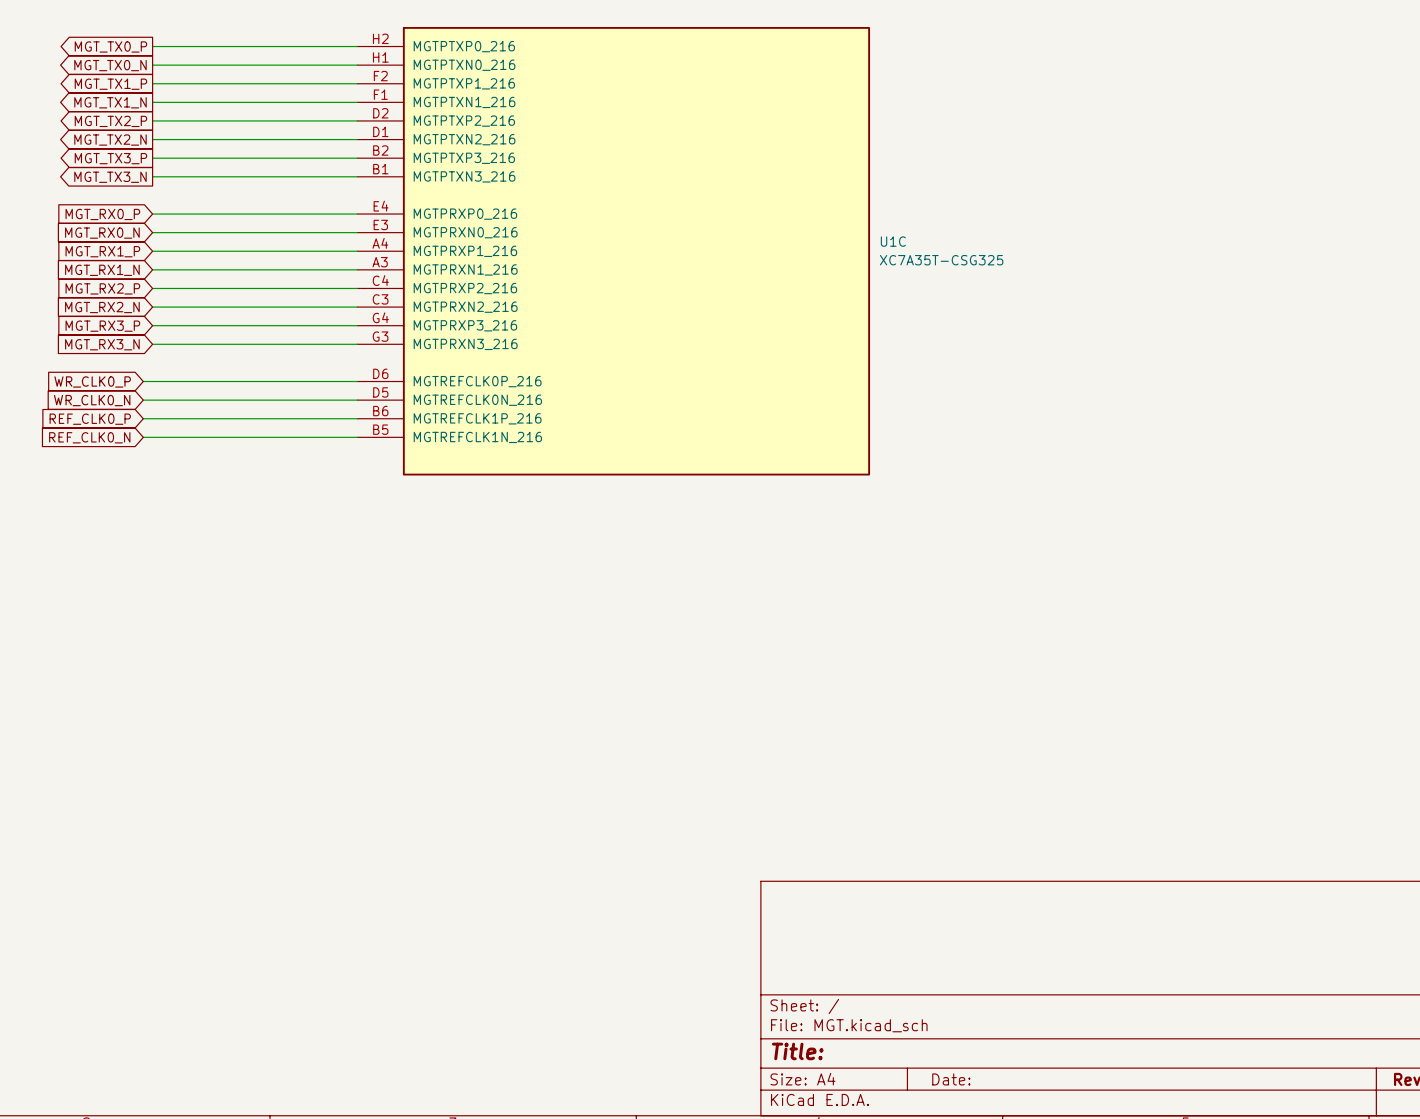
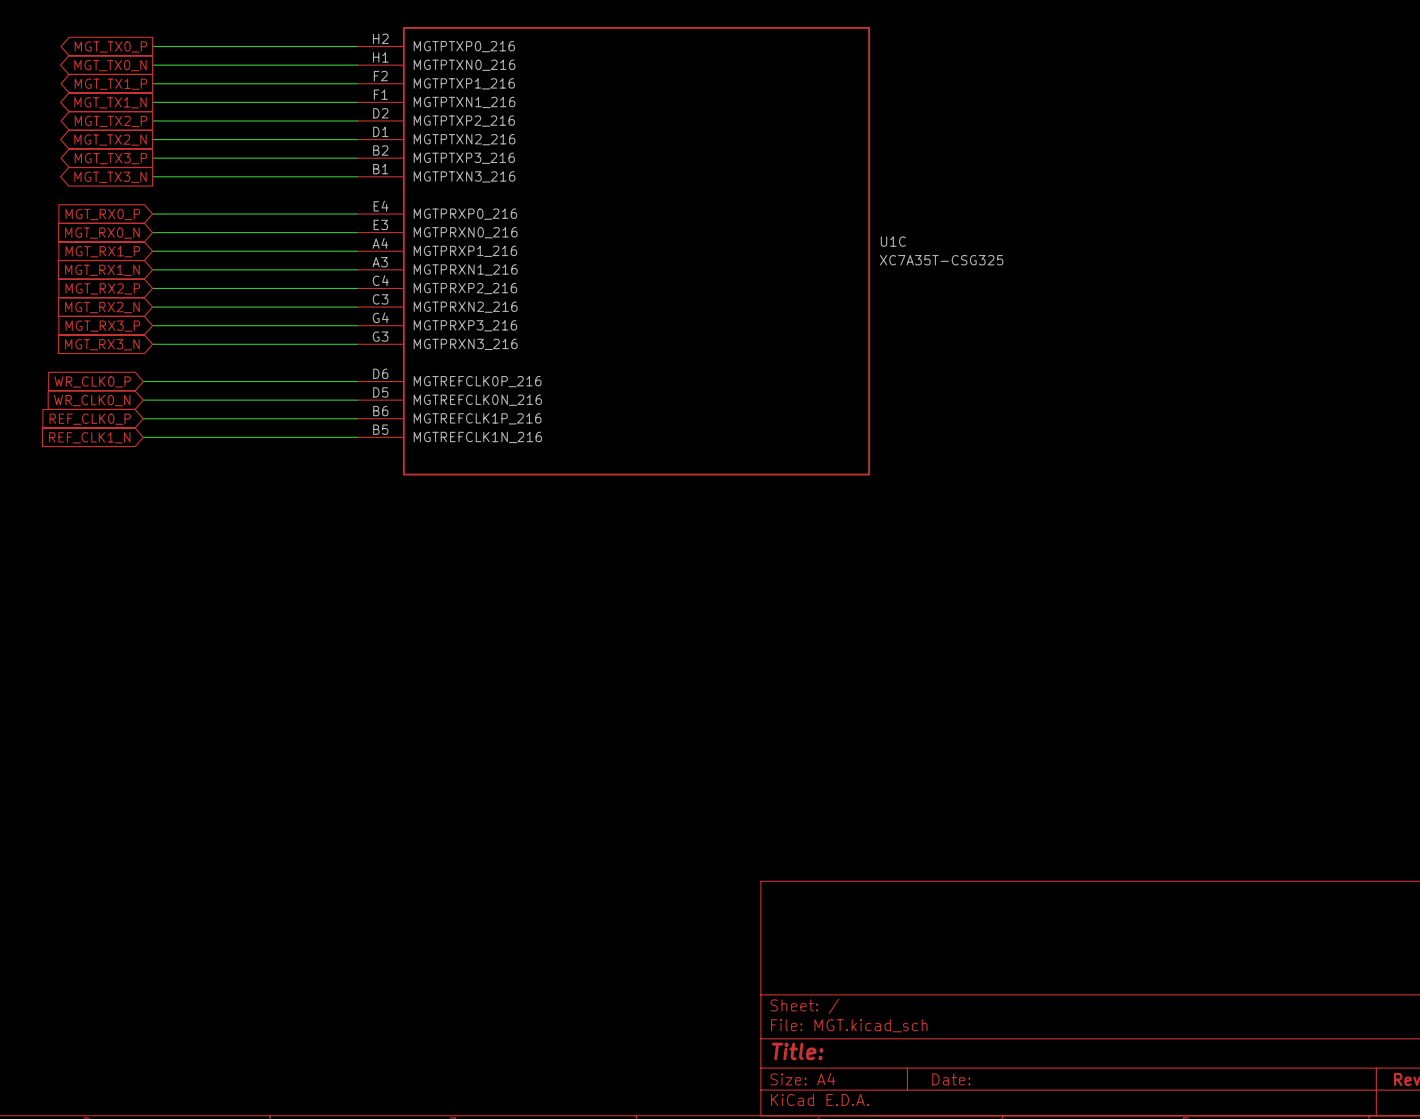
global label: REF_CLK0_N (89, 437) -> REF_CLK1_N (89, 437)

